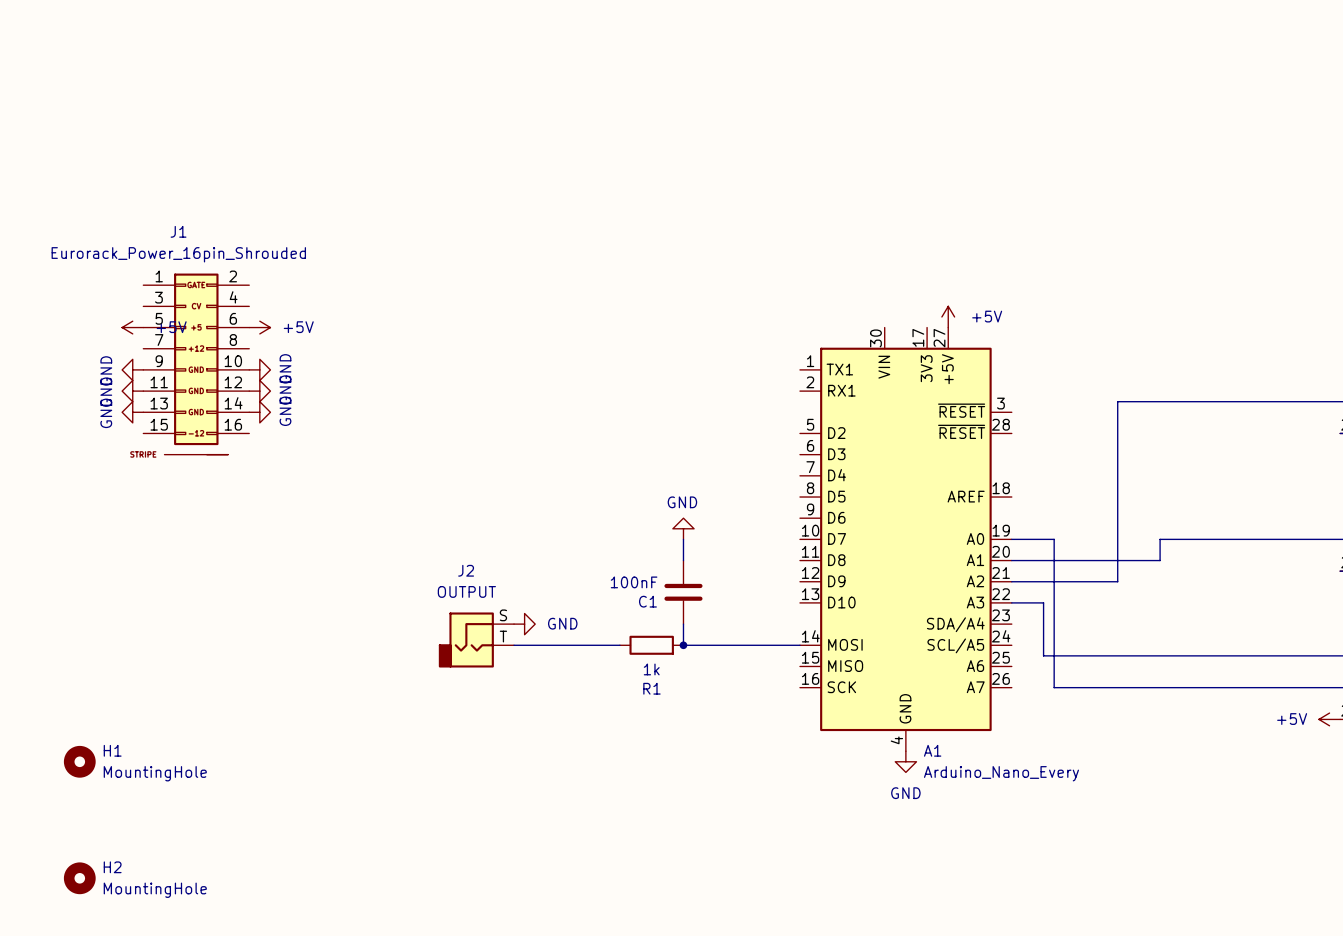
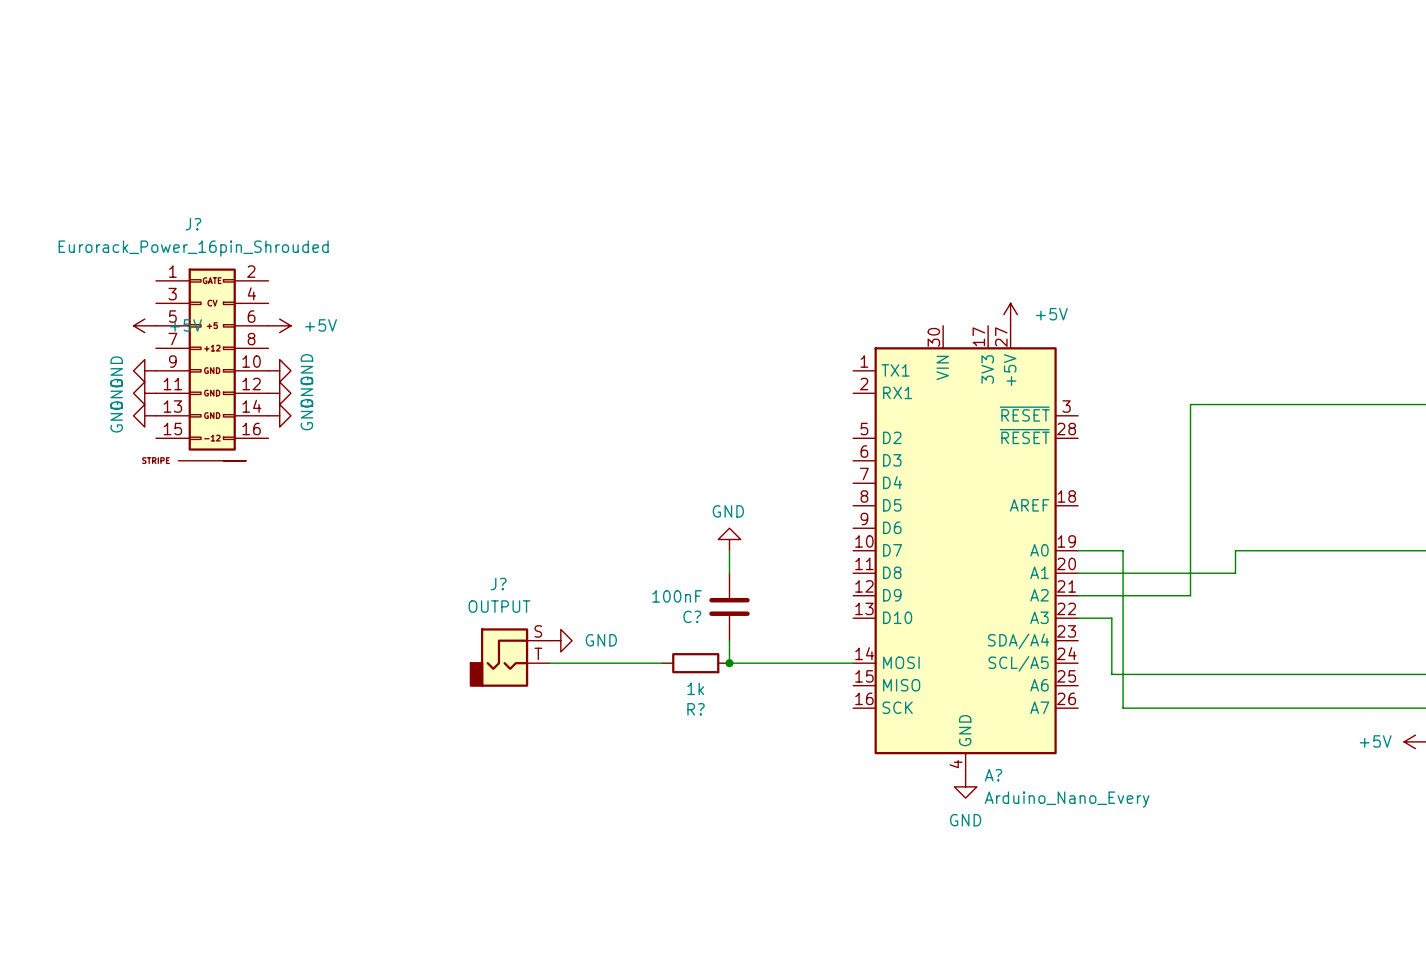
J1 name: J1 (178, 231) -> J? (193, 224)
J2 name: J2 (466, 570) -> J? (498, 584)
C1 name: C1 (647, 601) -> C? (692, 616)
R1 name: R1 (651, 688) -> R? (696, 709)
A1 name: A1 (932, 750) -> A? (993, 775)
H1: MountingHole (79, 761) -> none
H2: MountingHole (79, 878) -> none

